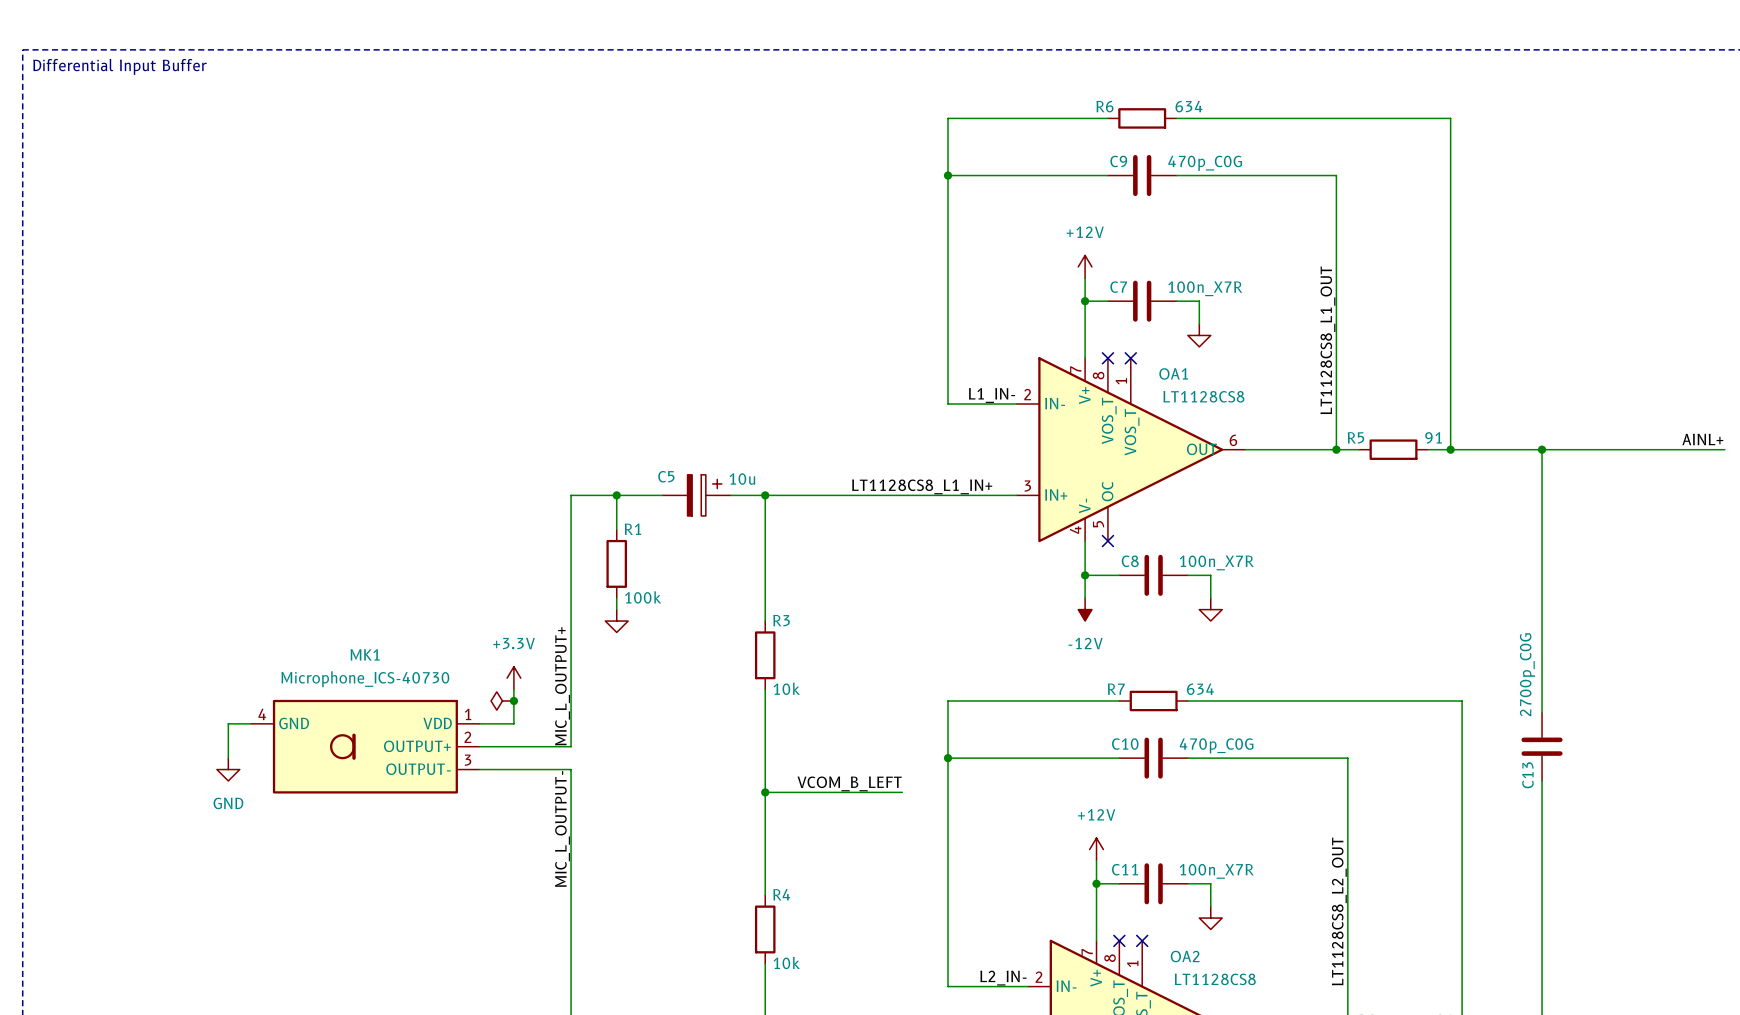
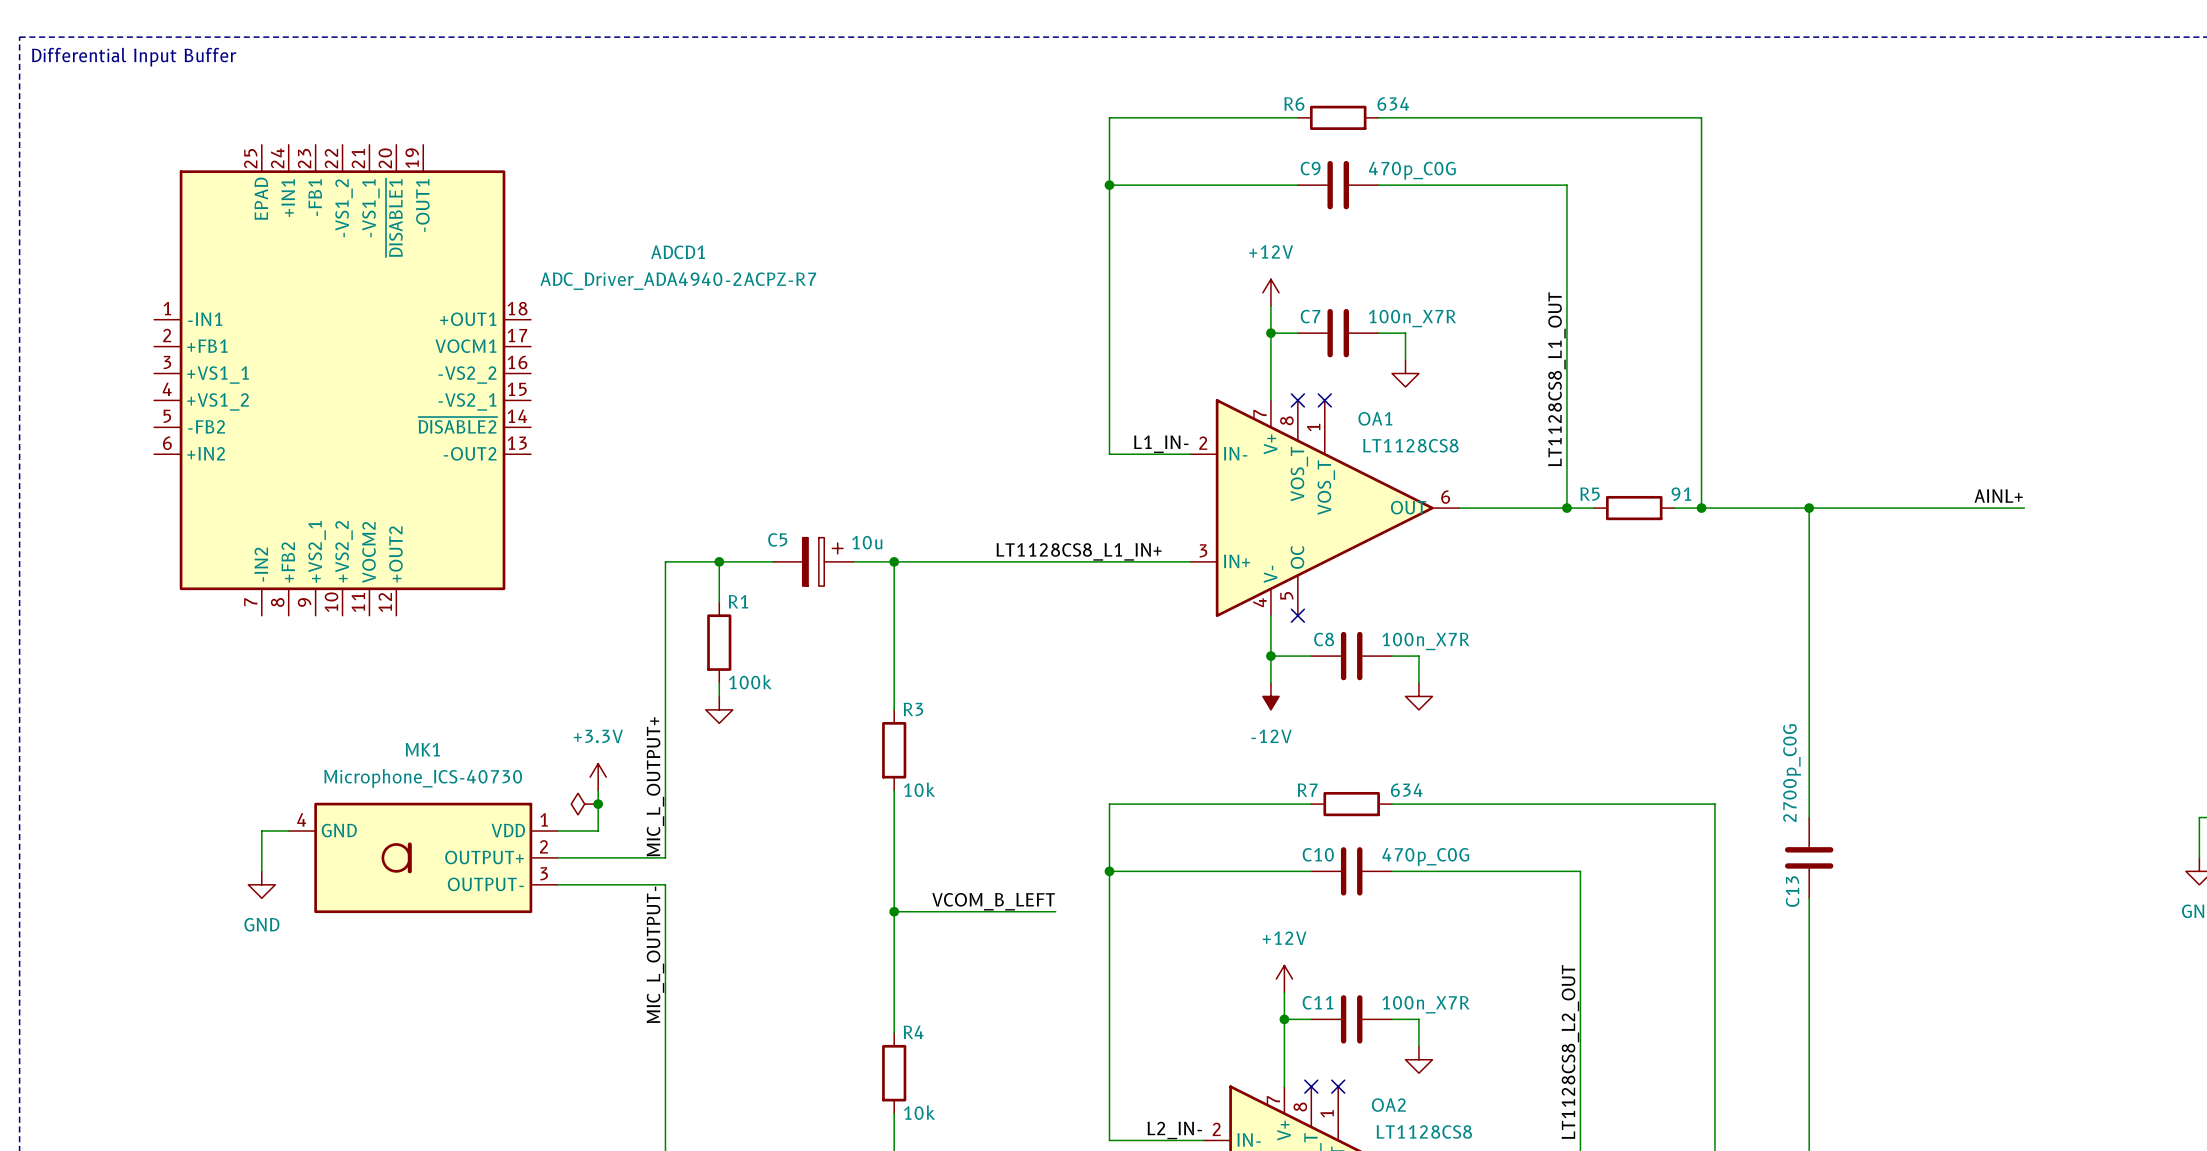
ADCD1: none -> ADC_Driver_ADA4940-2ACPZ-R7 (342, 380)

